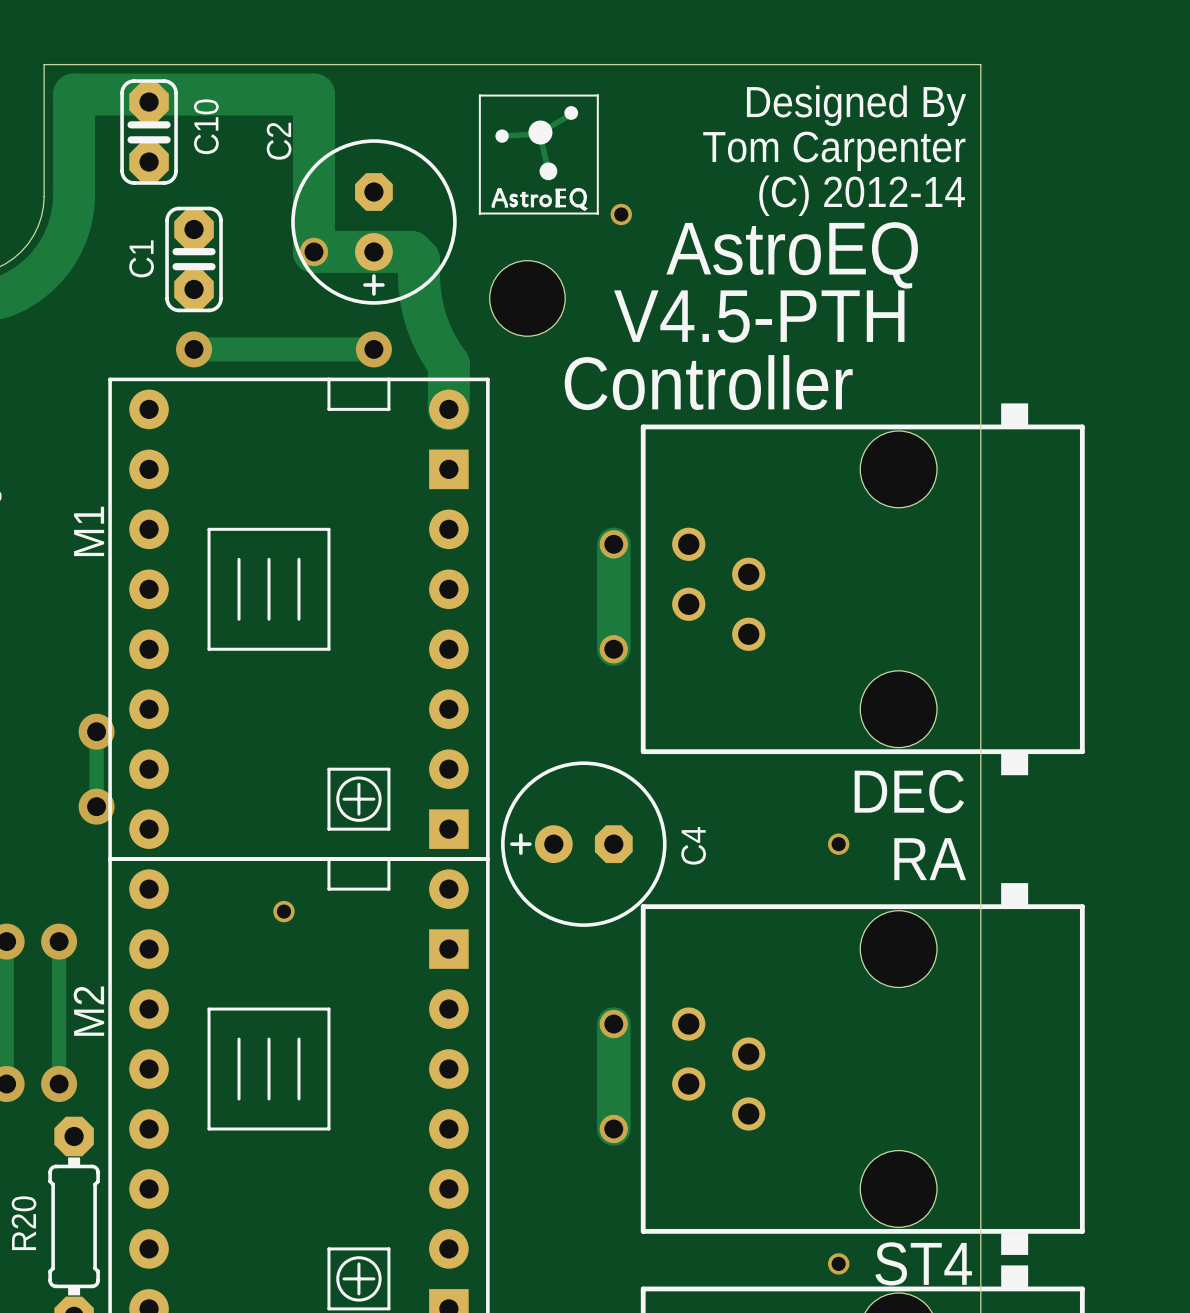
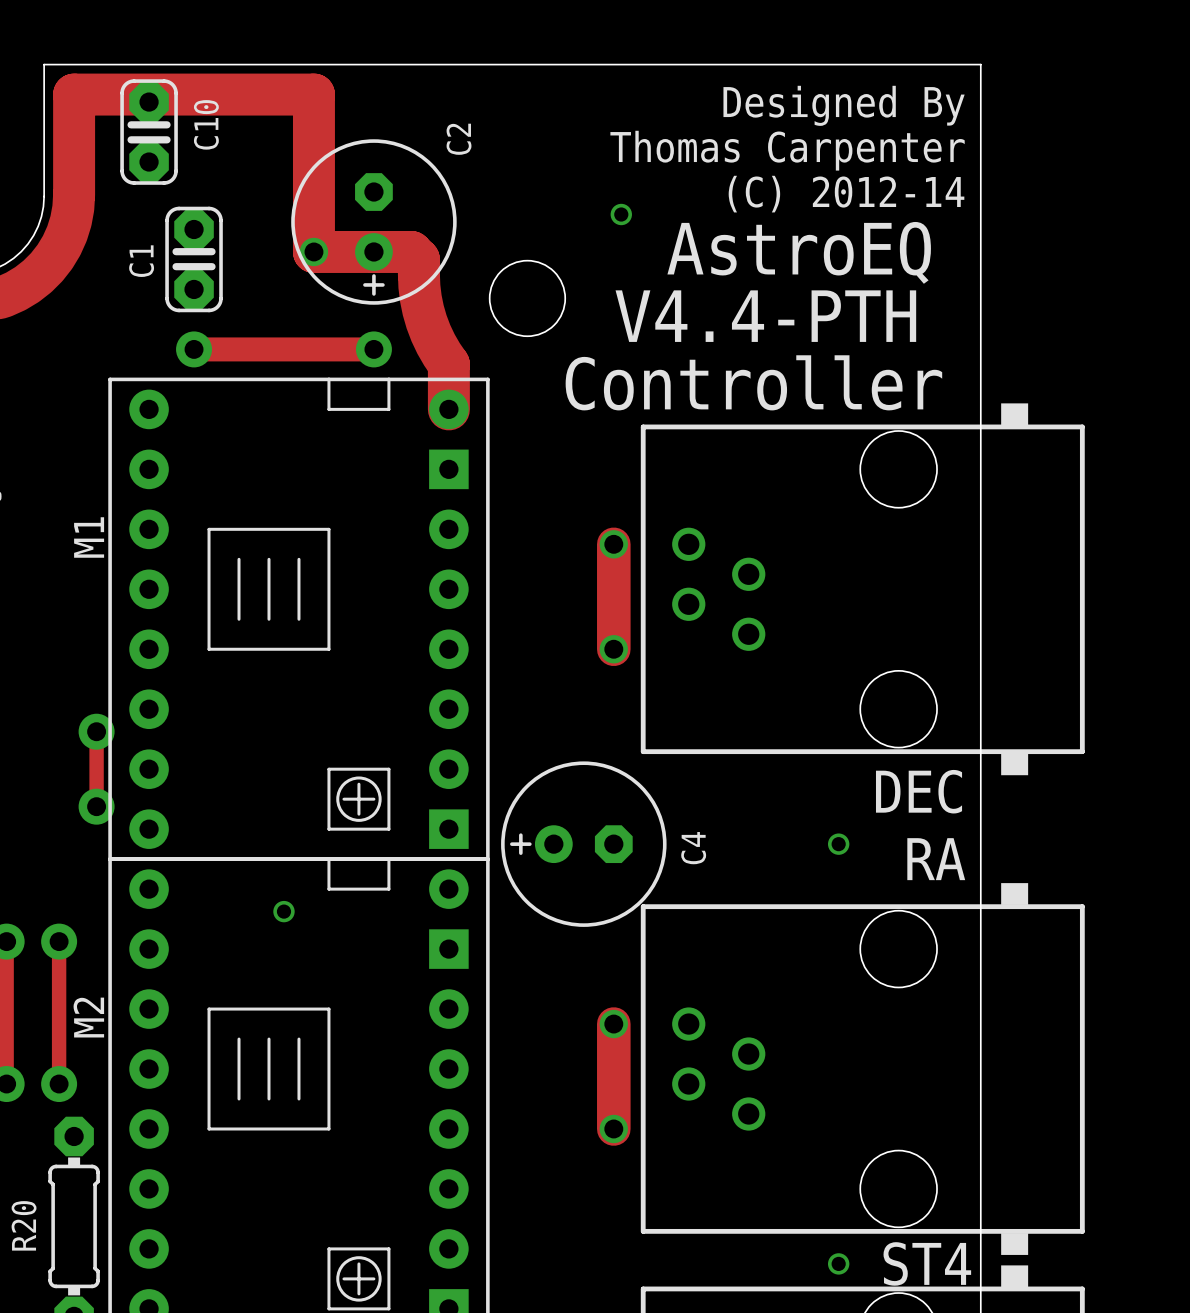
drawing: [478, 94, 599, 215] -> none
C2 name position: C2 (279, 141) -> C2 (459, 139)
text: Tom Carpenter (834, 151) -> Thomas Carpenter (787, 150)
text: V4.5-PTH (759, 316) -> V4.4-PTH (765, 316)

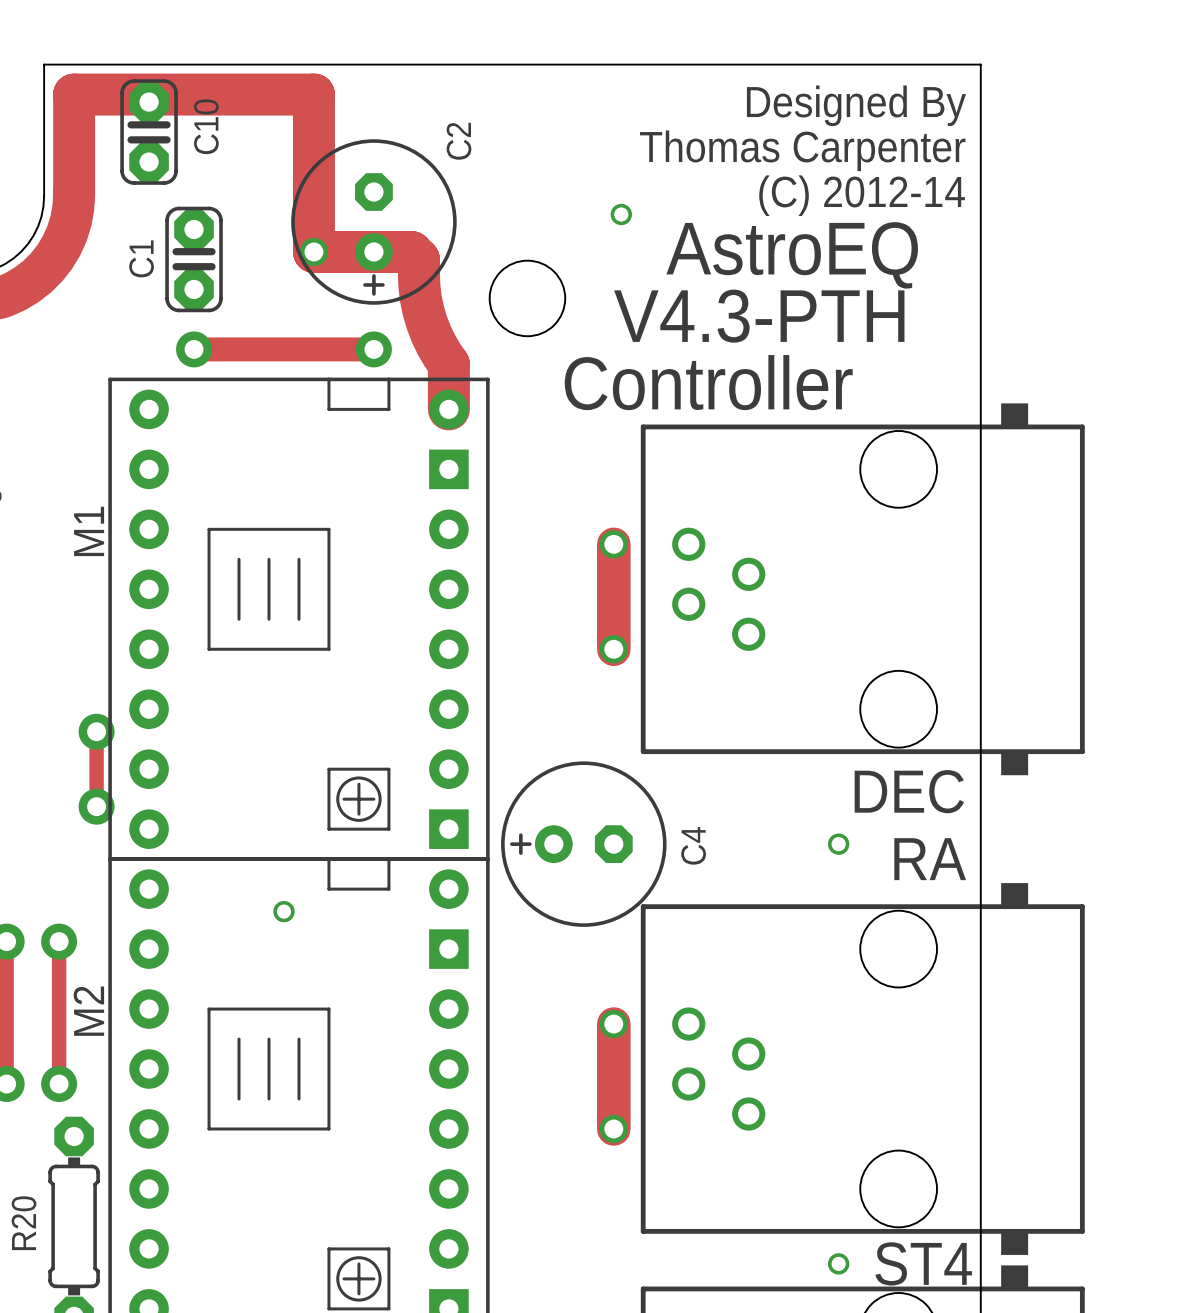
text: V4.4-PTH (765, 316) -> V4.3-PTH (759, 316)

